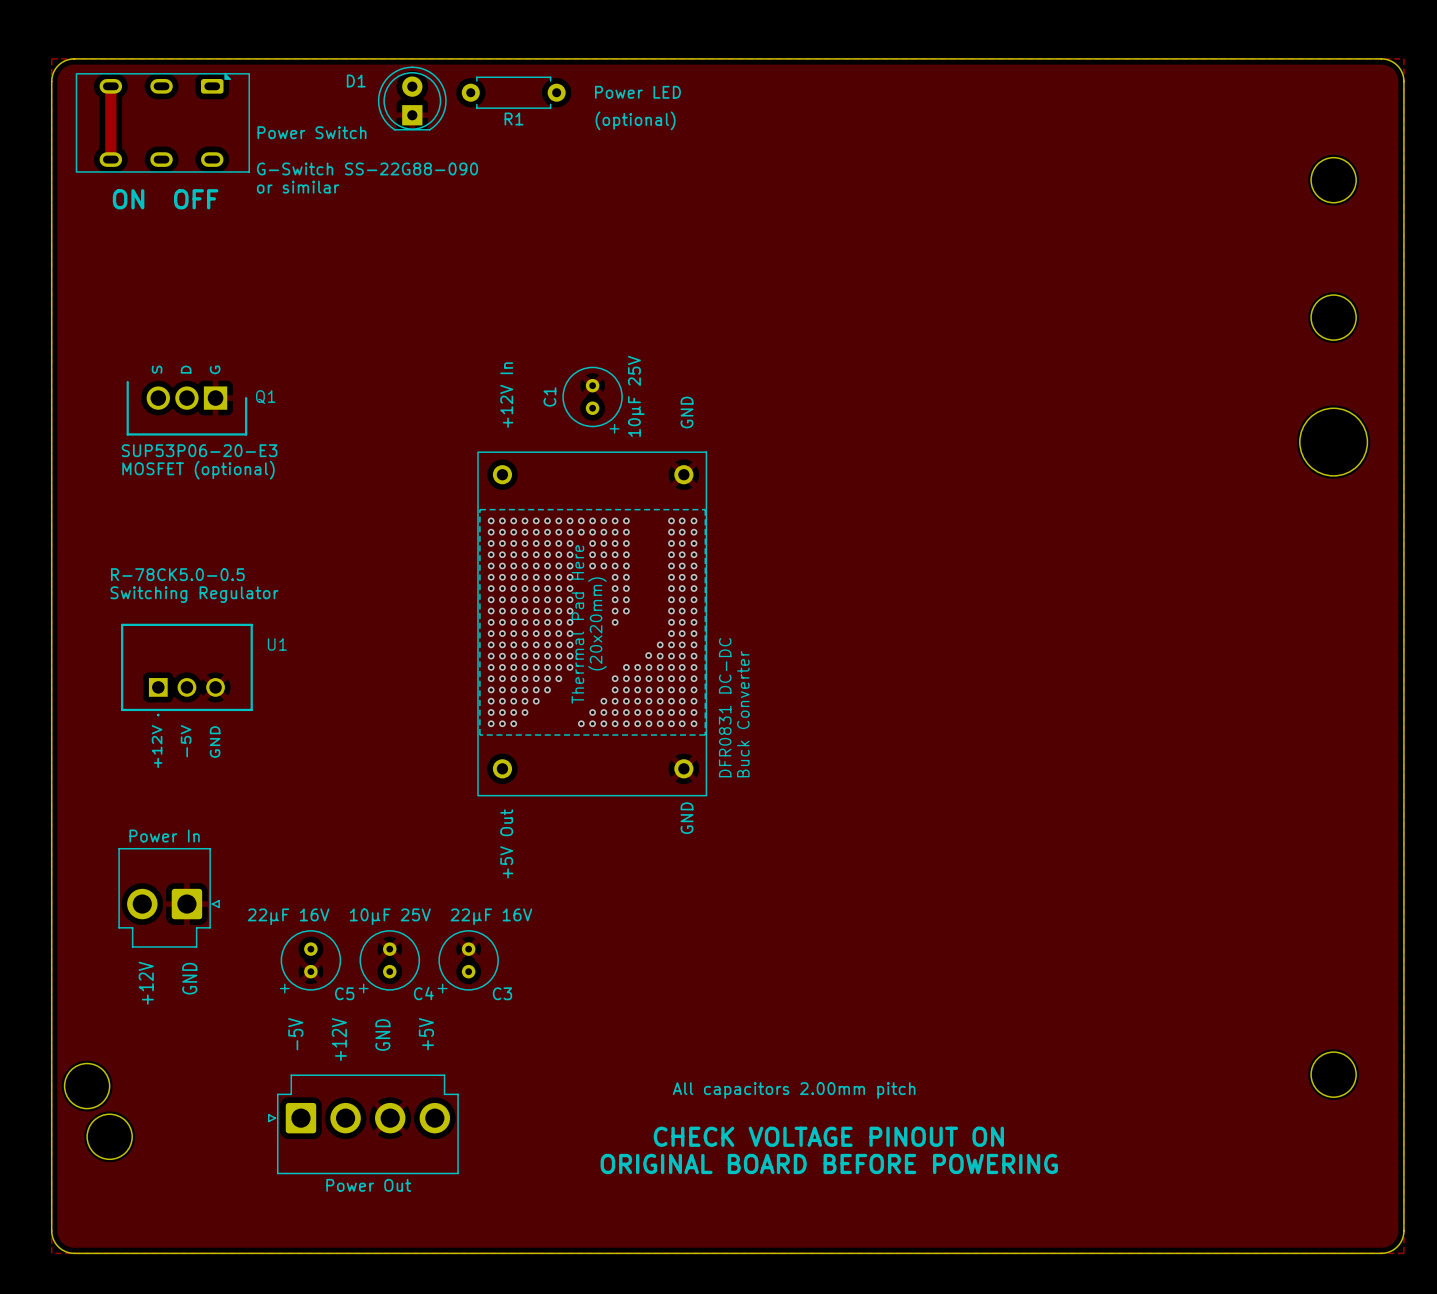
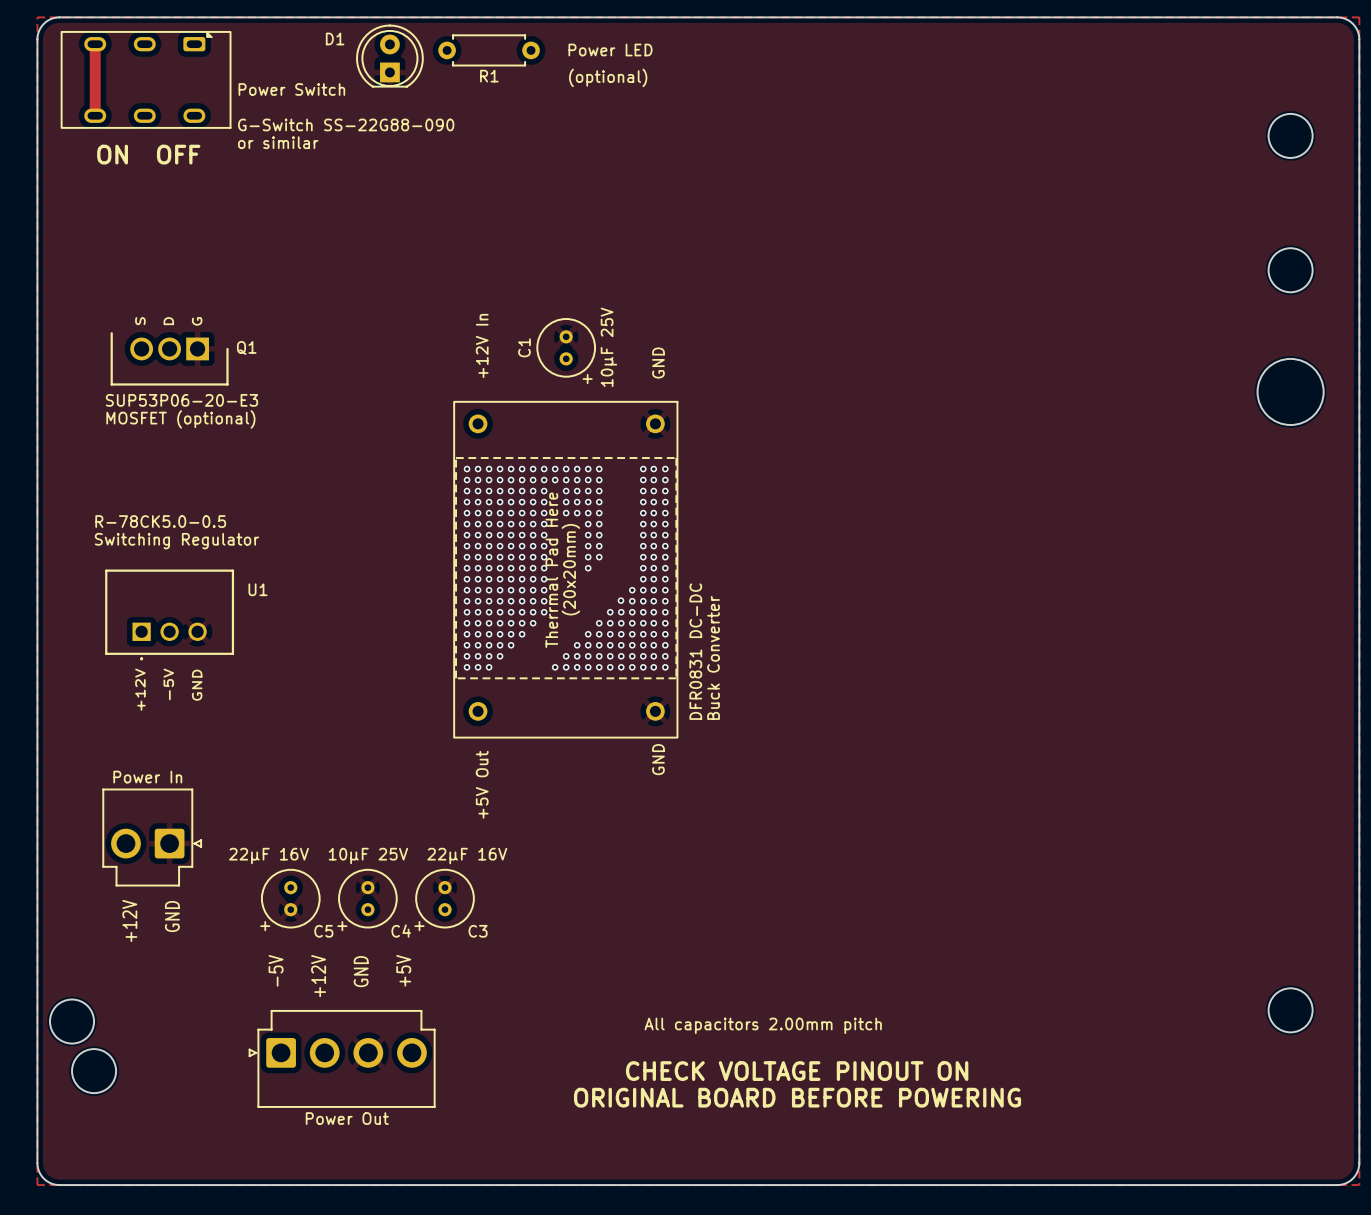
via: (626, 667) -> none
via: (615, 678) -> none

